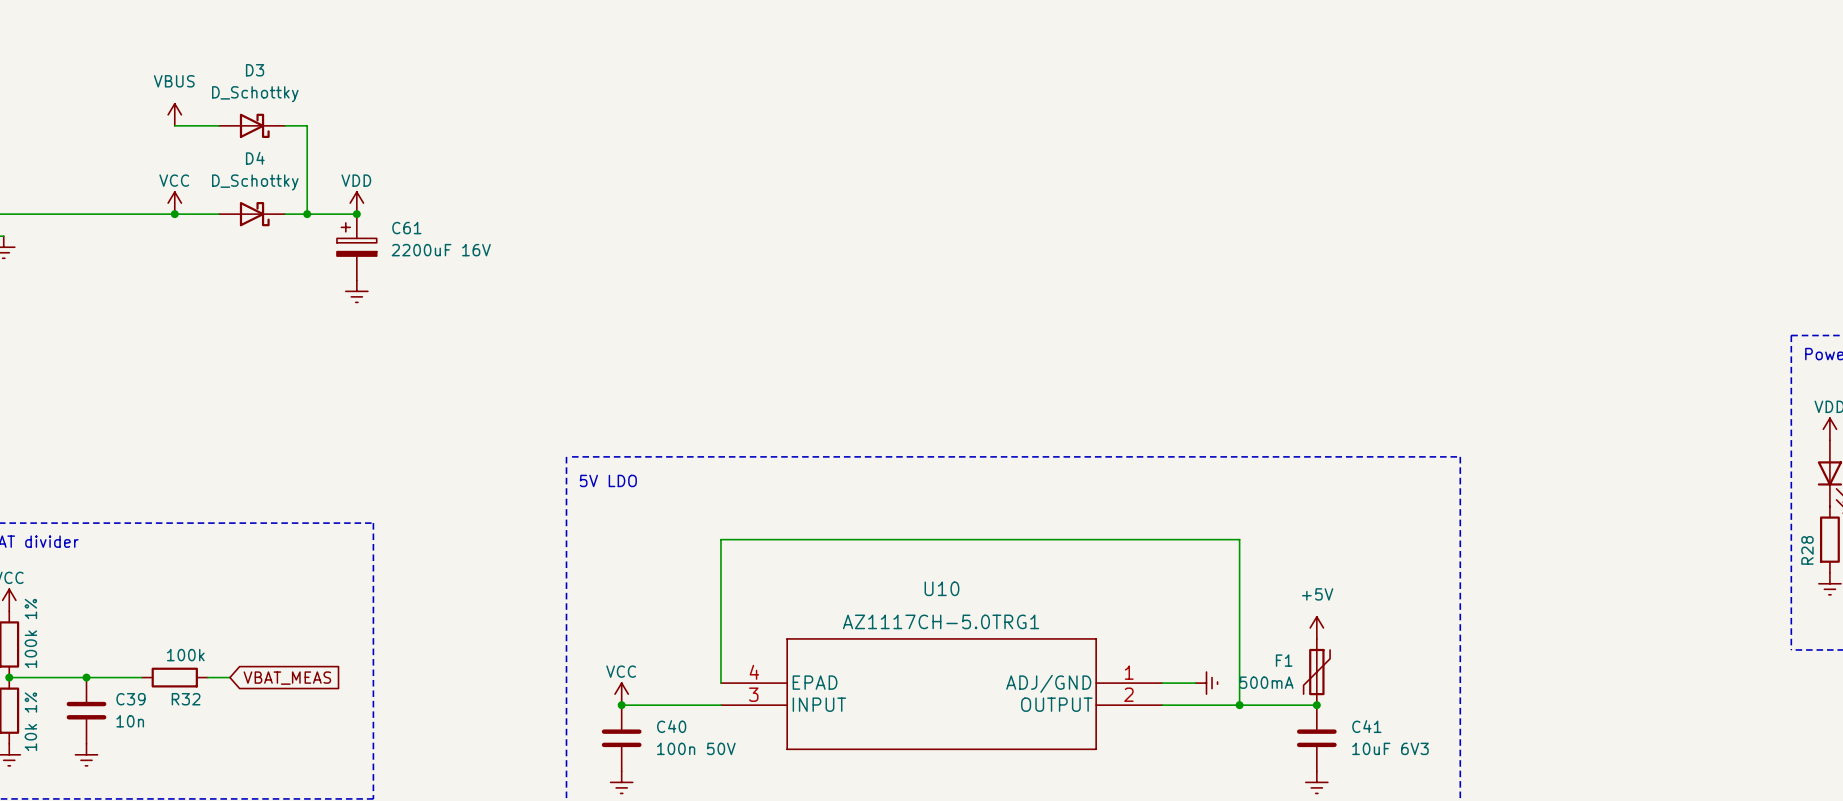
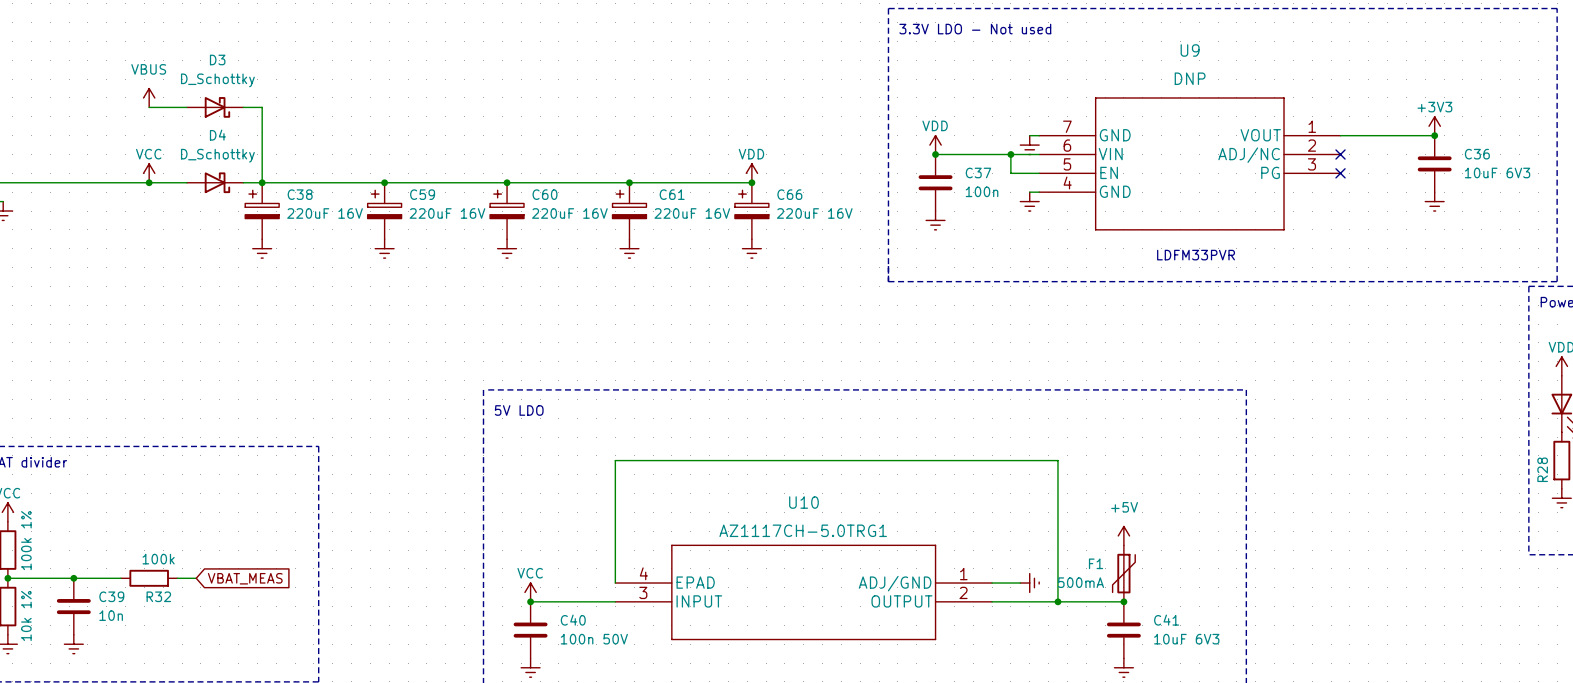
line: none -> (888, 8) (888, 281) (1557, 281) (1557, 8) (888, 8)
text: none -> 3.3V LDO - Not used (975, 29)
power symbol: none -> +3V3 (1434, 126)
wire: none -> (1029, 135) (1039, 135)
wire: none -> (1340, 135) (1434, 135)
junction: none -> (1434, 135)
power symbol: none -> VDD (935, 145)
power symbol: none -> (1029, 145)
wire: none -> (935, 154) (1039, 154)
junction: none -> (935, 154)
wire: none -> (1010, 154) (1010, 173) (1039, 173)
junction: none -> (1010, 154)
no-connect mark: none -> (1340, 154)
U9: none -> DNP (1189, 163)
C36: none -> 10uF 6V3 (1434, 163)
power symbol: VDD (356, 203) -> none
power symbol: none -> VDD (751, 173)
no-connect mark: none -> (1340, 173)
wire: none -> (304, 182) (751, 182)
junction: (356, 214) -> none
junction: none -> (384, 182)
junction: none -> (507, 182)
junction: none -> (629, 182)
junction: none -> (751, 182)
C37: none -> 100n (935, 182)
wire: none -> (1029, 192) (1039, 192)
power symbol: none -> (1029, 201)
power symbol: none -> (1434, 201)
C38: none -> 220uF 16V (262, 211)
C61 position: (356, 247) -> (629, 211)
C59: none -> 220uF 16V (384, 211)
C60: none -> 220uF 16V (507, 211)
C66: none -> 220uF 16V (751, 211)
C61 value: 2200uF 16V (441, 250) -> 220uF 16V (692, 213)
power symbol: none -> (935, 220)
power symbol: none -> (262, 248)
power symbol: (356, 291) -> none
power symbol: none -> (384, 248)
power symbol: none -> (507, 248)
power symbol: none -> (629, 248)
power symbol: none -> (751, 248)
text: none -> LDFM33PVR (1196, 255)

